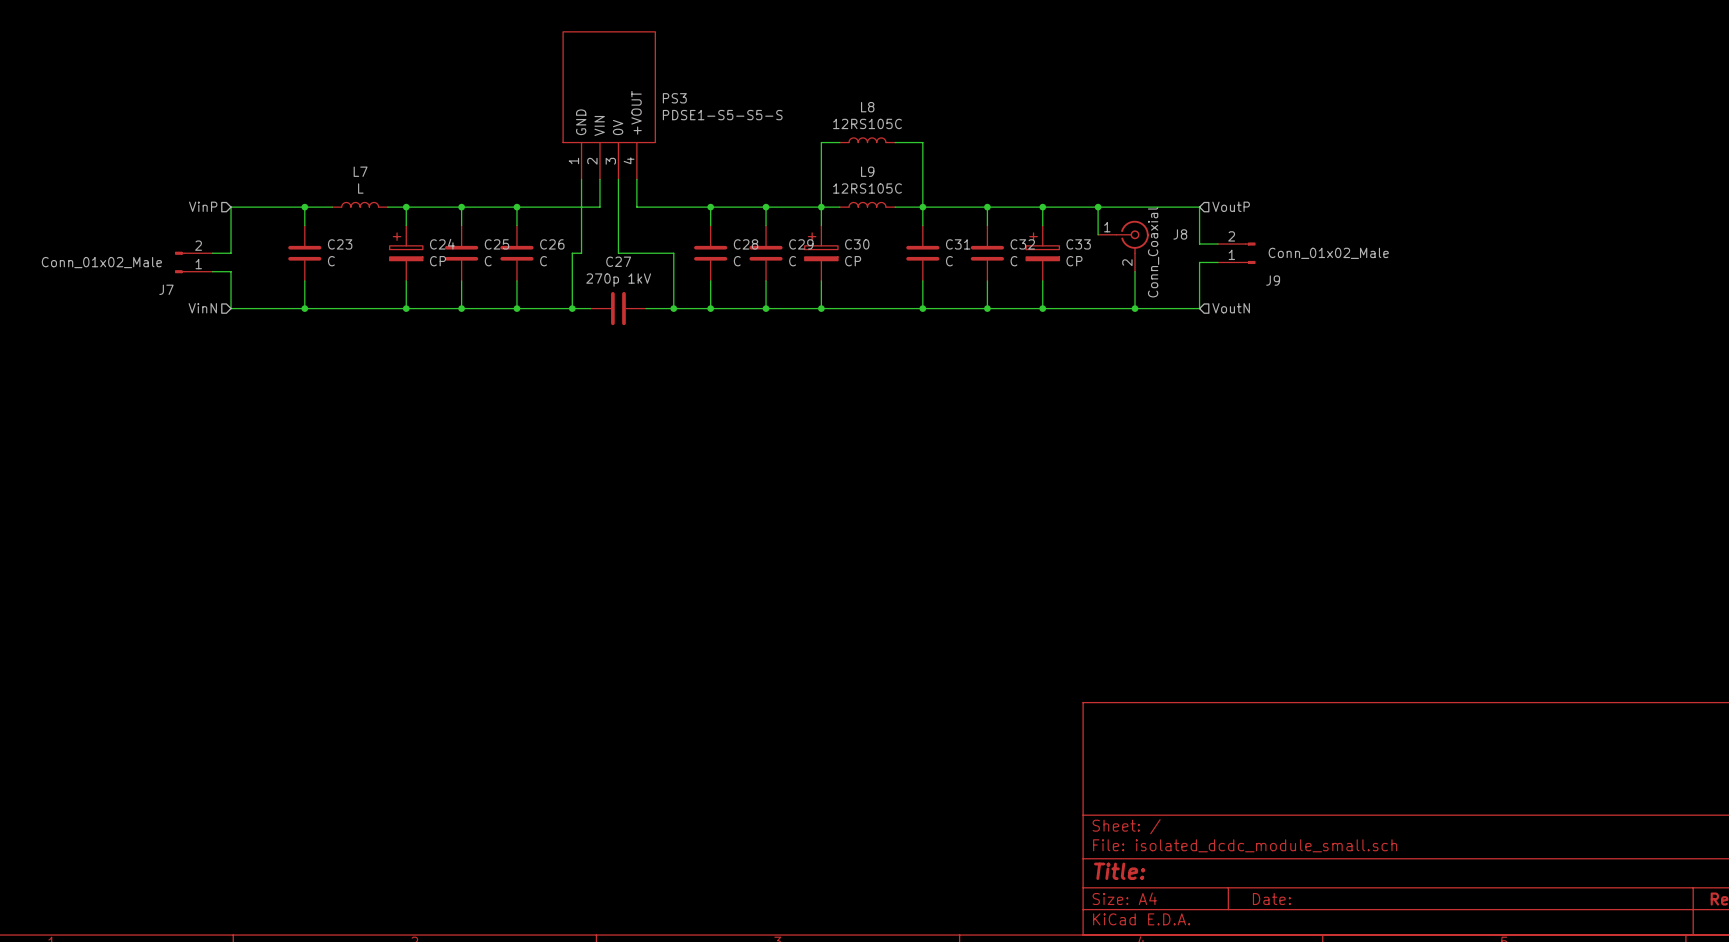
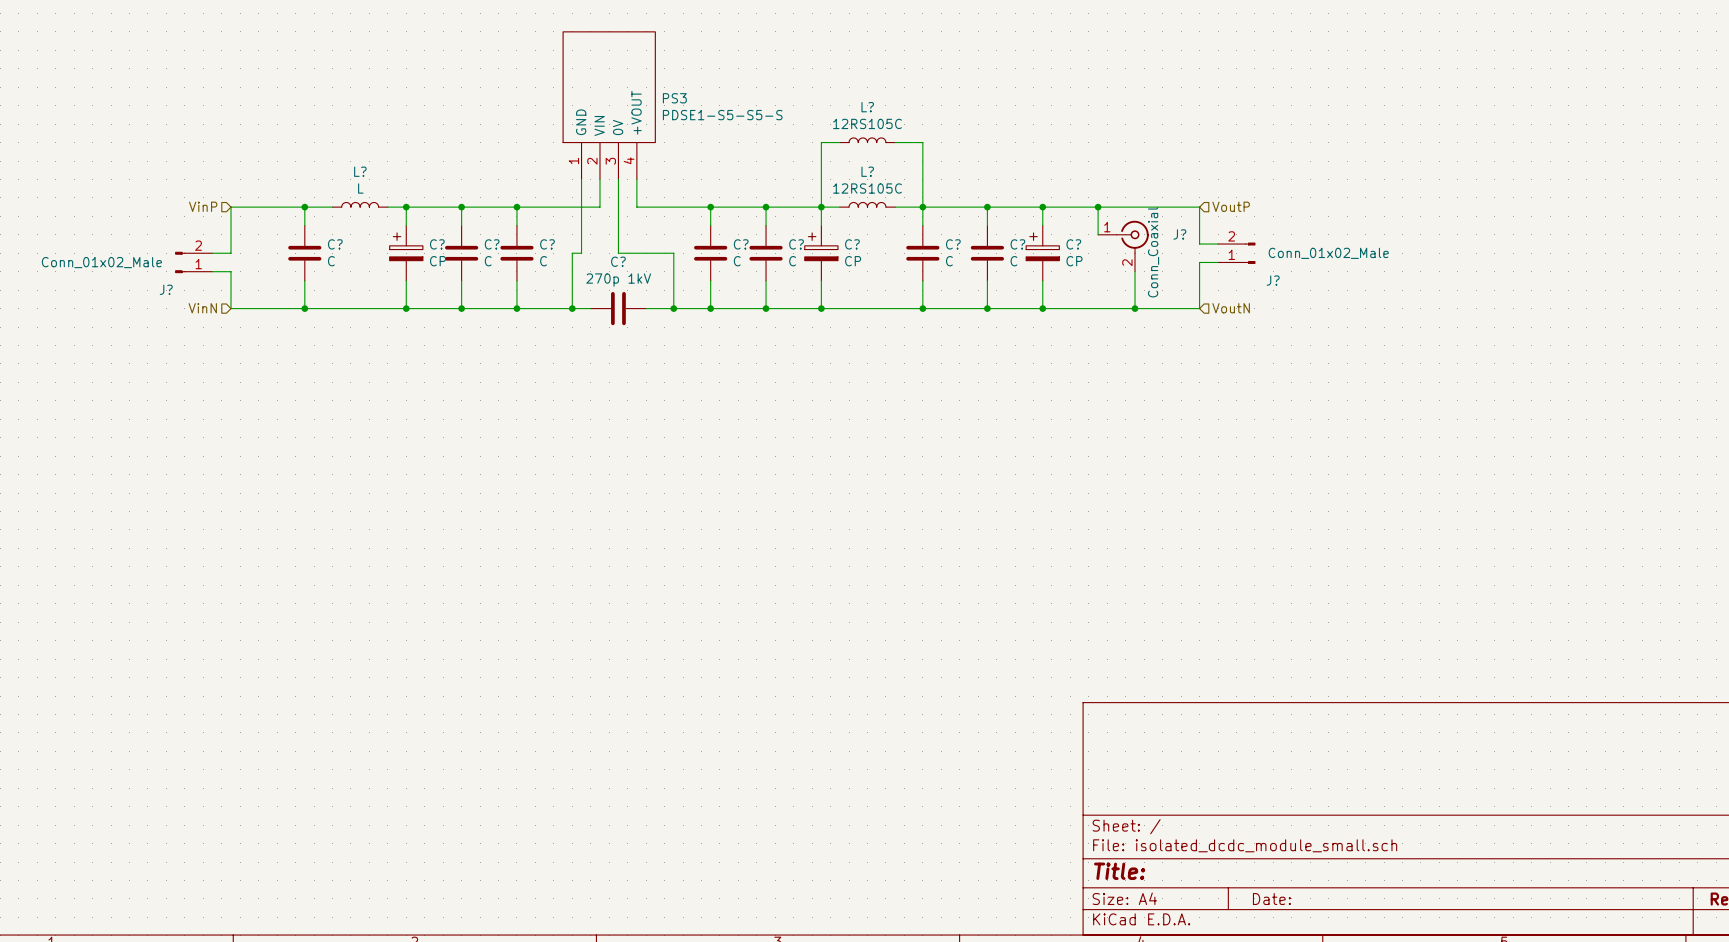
L8 name: L8 (867, 107) -> L? (867, 107)
L7 name: L7 (360, 171) -> L? (360, 171)
L9 name: L9 (867, 171) -> L? (867, 171)
J8 name: J8 (1180, 234) -> J? (1179, 234)
C23 name: C23 (340, 244) -> C? (335, 244)
C24 name: C24 (442, 244) -> C? (437, 244)
C25 name: C25 (496, 244) -> C? (492, 244)
C26 name: C26 (552, 244) -> C? (547, 244)
C28 name: C28 (746, 244) -> C? (741, 244)
C29 name: C29 (801, 244) -> C? (796, 244)
C30 name: C30 (857, 244) -> C? (852, 244)
C31 name: C31 (958, 244) -> C? (953, 244)
C32 name: C32 (1022, 244) -> C? (1017, 244)
C33 name: C33 (1078, 244) -> C? (1073, 244)
C27 name: C27 (618, 261) -> C? (618, 261)
J9 name: J9 (1273, 280) -> J? (1273, 280)
J7 name: J7 (166, 289) -> J? (166, 289)

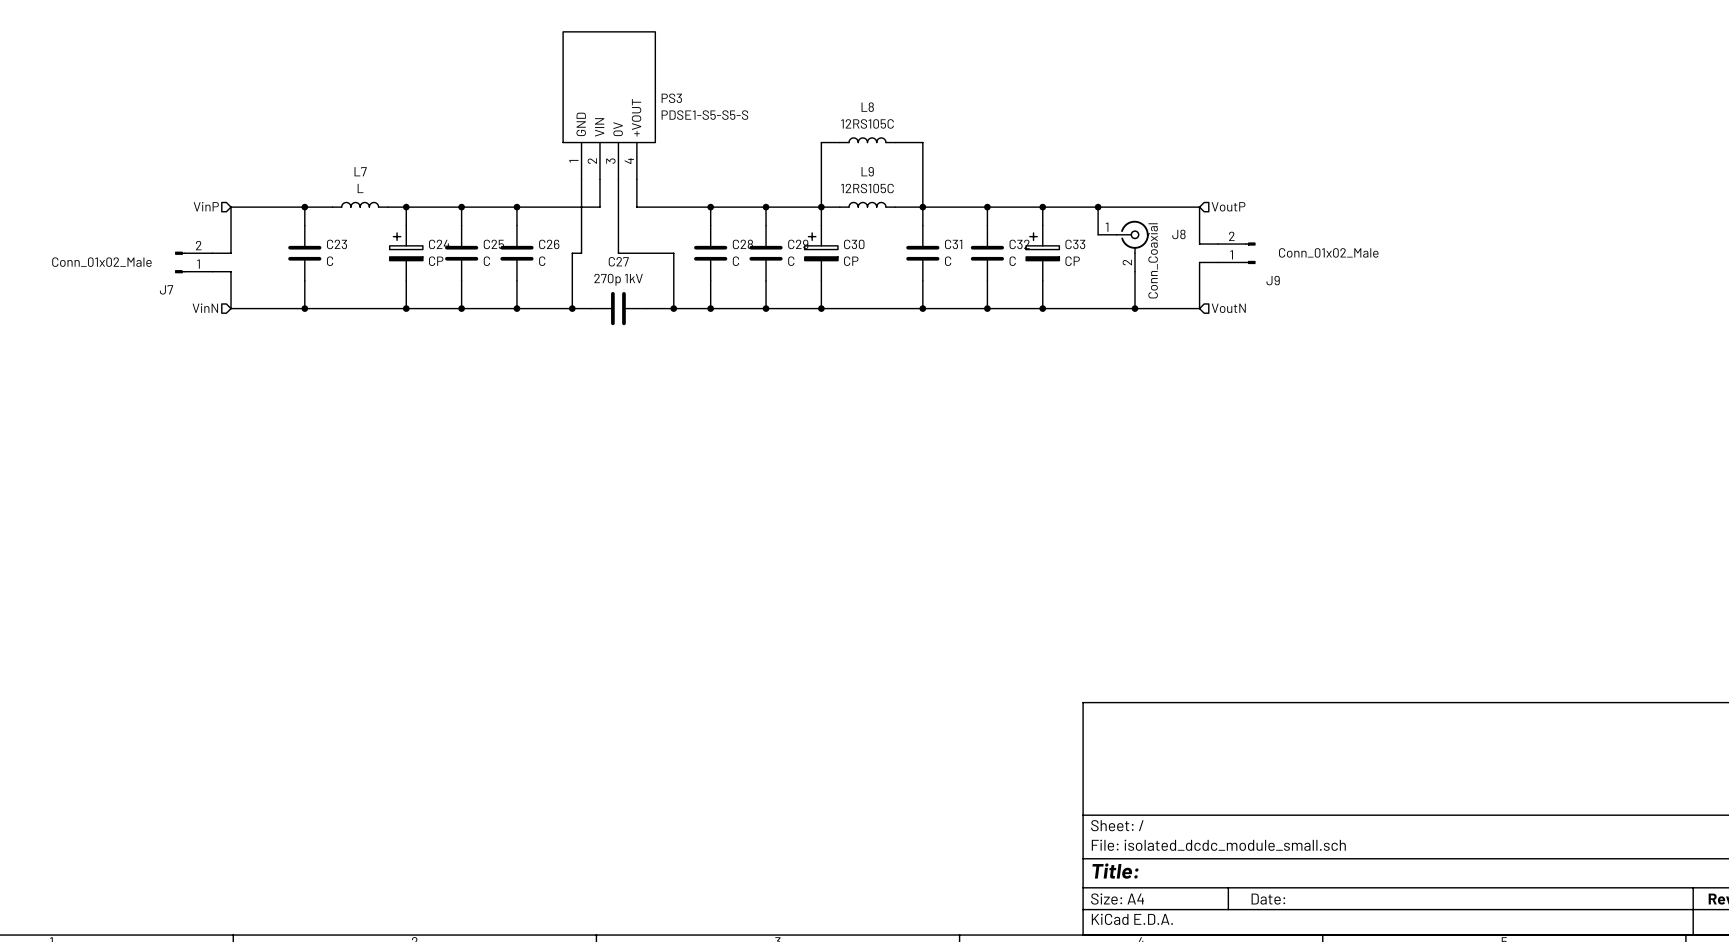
L? name: L? (867, 107) -> L8 (867, 107)
L? name: L? (360, 171) -> L7 (360, 171)
L? name: L? (867, 171) -> L9 (867, 171)
J? name: J? (1179, 234) -> J8 (1178, 234)
C? name: C? (335, 244) -> C23 (336, 244)
C? name: C? (437, 244) -> C24 (439, 244)
C? name: C? (492, 244) -> C25 (493, 244)
C? name: C? (547, 244) -> C26 (549, 244)
C? name: C? (741, 244) -> C28 (742, 244)
C? name: C? (796, 244) -> C29 (798, 244)
C? name: C? (852, 244) -> C30 (854, 244)
C? name: C? (953, 244) -> C31 (953, 244)
C? name: C? (1017, 244) -> C32 (1019, 244)
C? name: C? (1073, 244) -> C33 (1075, 244)
C? name: C? (618, 261) -> C27 (618, 261)
J? name: J? (1273, 280) -> J9 (1273, 280)
J? name: J? (166, 289) -> J7 (166, 289)

